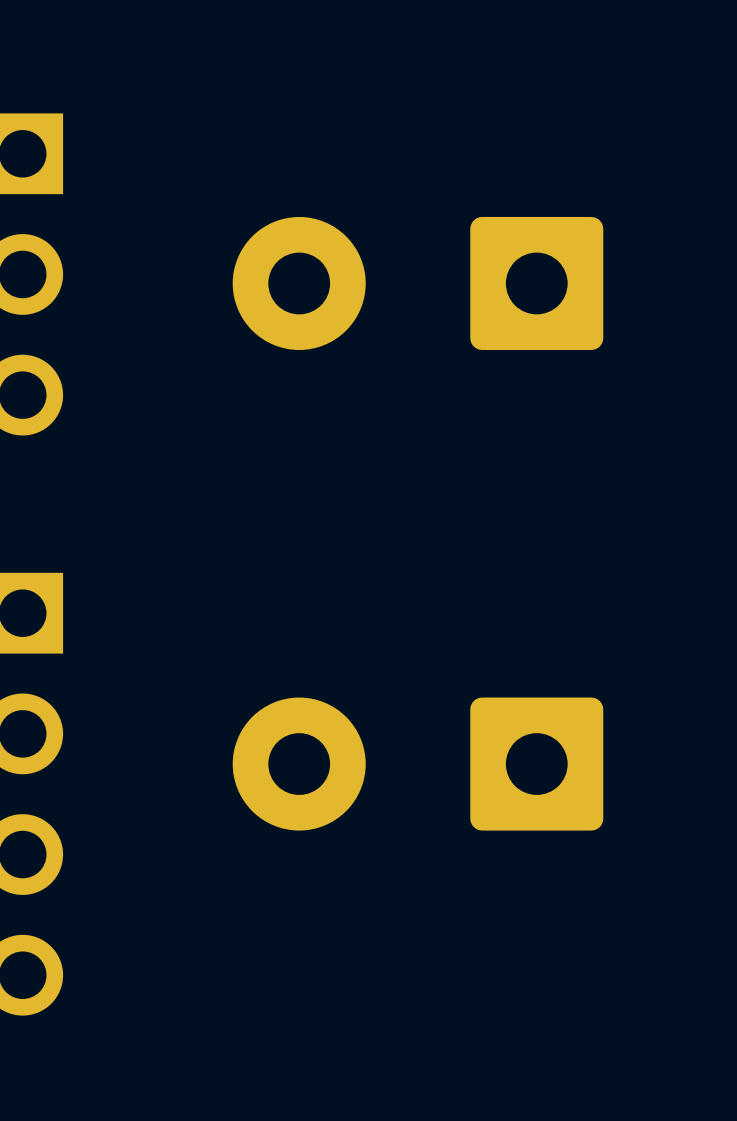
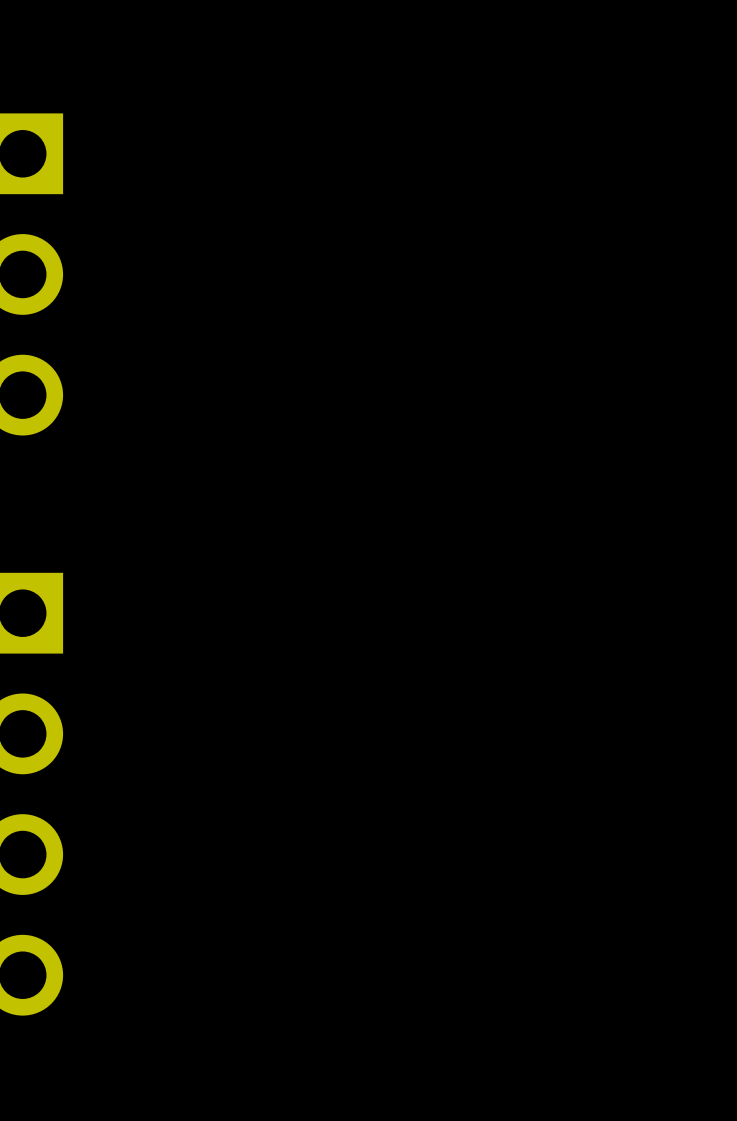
part: (417, 283) -> none
part: (417, 764) -> none

